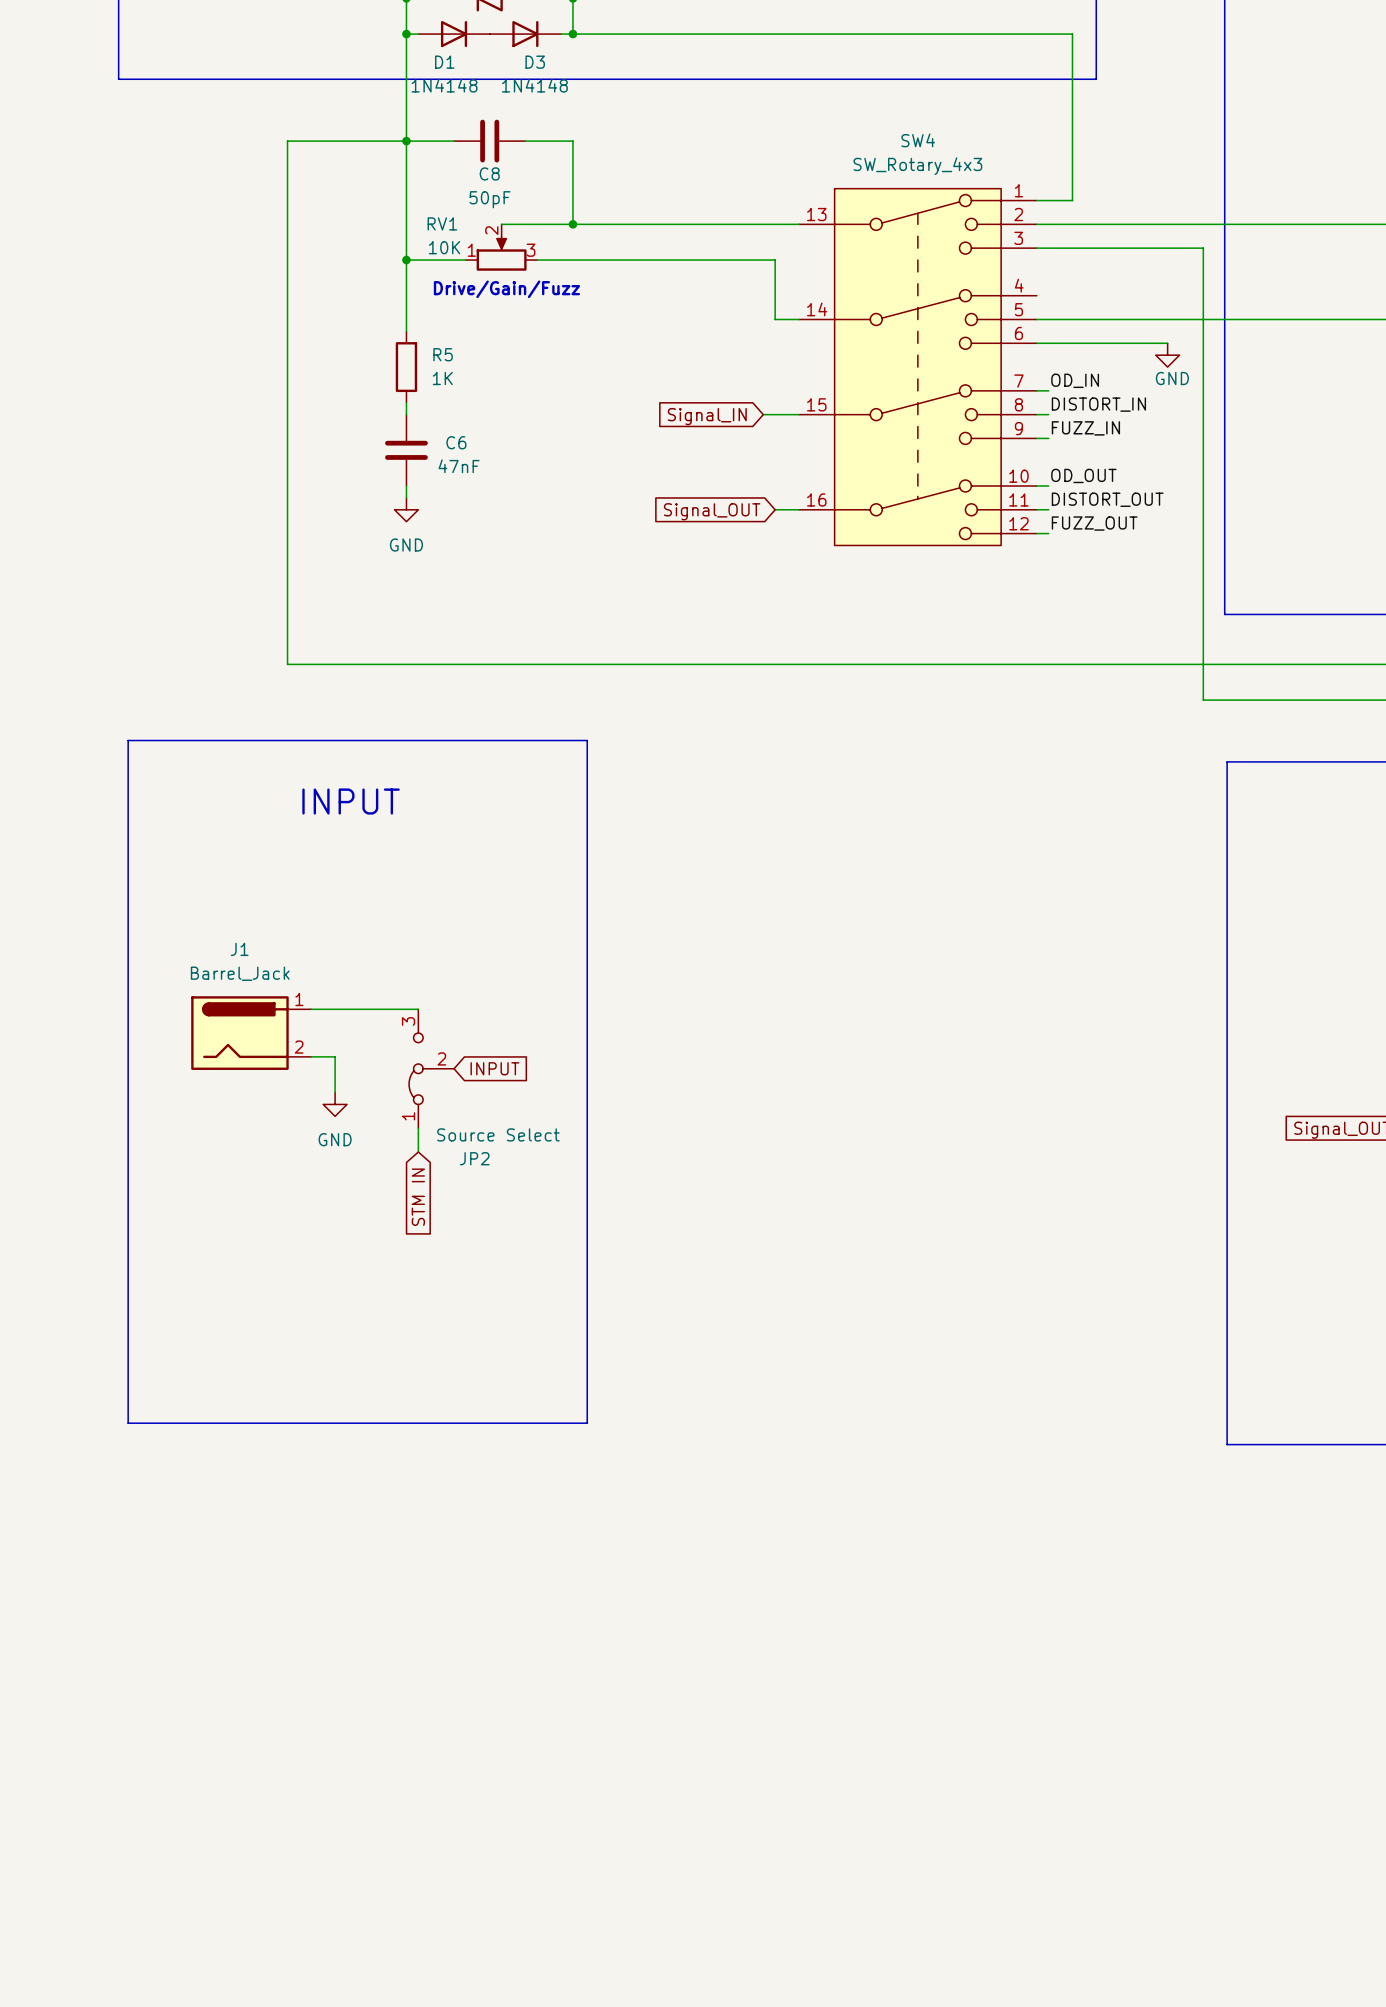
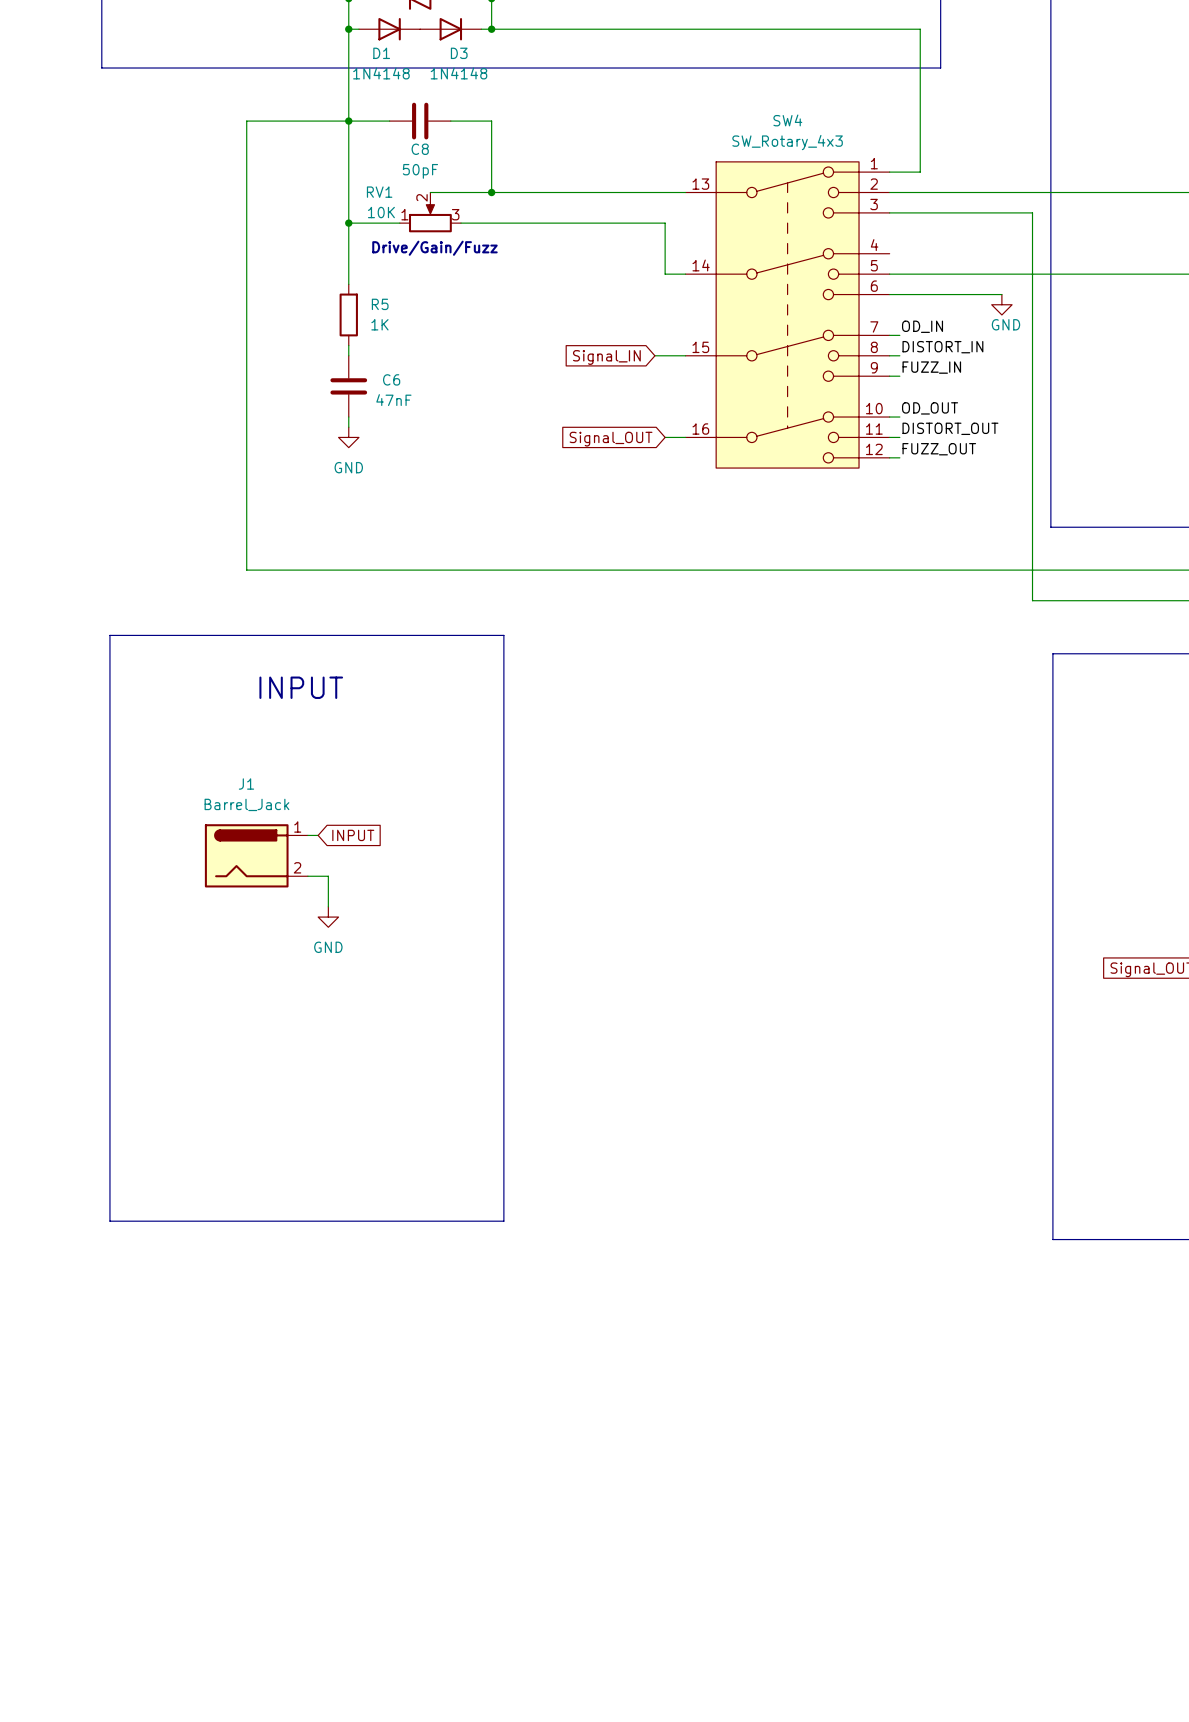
wire: none -> (307, 835) (318, 835)
wire: (311, 1009) (418, 1009) -> none
J1 position: (251, 1033) -> (256, 855)
wire: (311, 1056) (335, 1056) (335, 1092) -> (307, 876) (328, 876) (328, 906)
JP2: Source Select (431, 1068) -> none
global label position: INPUT (494, 1068) -> INPUT (353, 835)
power symbol position: GND (335, 1104) -> GND (328, 917)
wire: (418, 1128) (418, 1152) -> none
global label: STM IN (418, 1197) -> none

